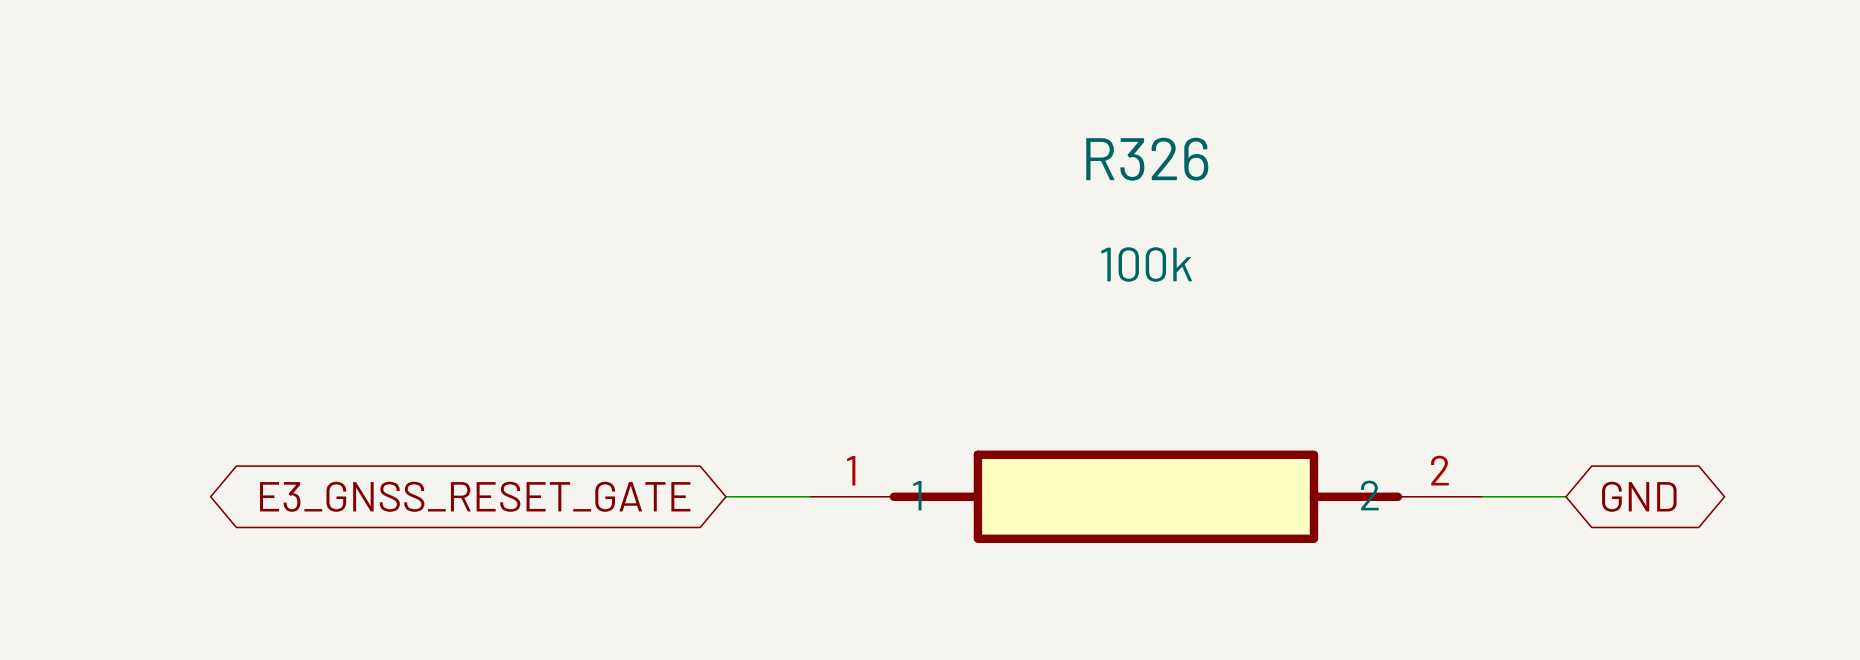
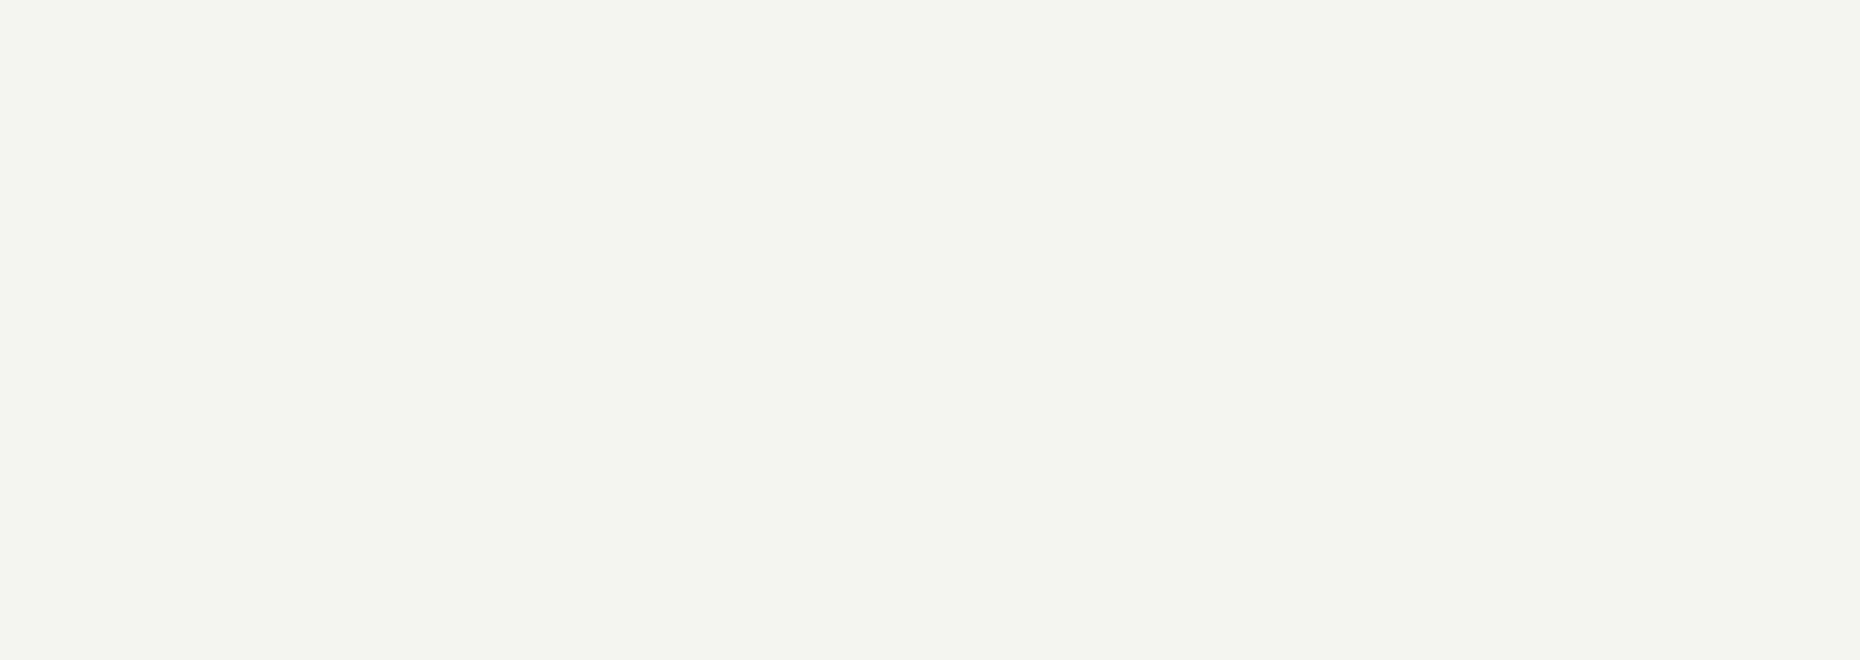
global label: E3_GNSS_RESET_GATE (475, 496) -> none
wire: (725, 496) (809, 496) -> none
R326: 100k (1145, 496) -> none
wire: (1481, 496) (1565, 496) -> none
global label: GND (1639, 496) -> none

